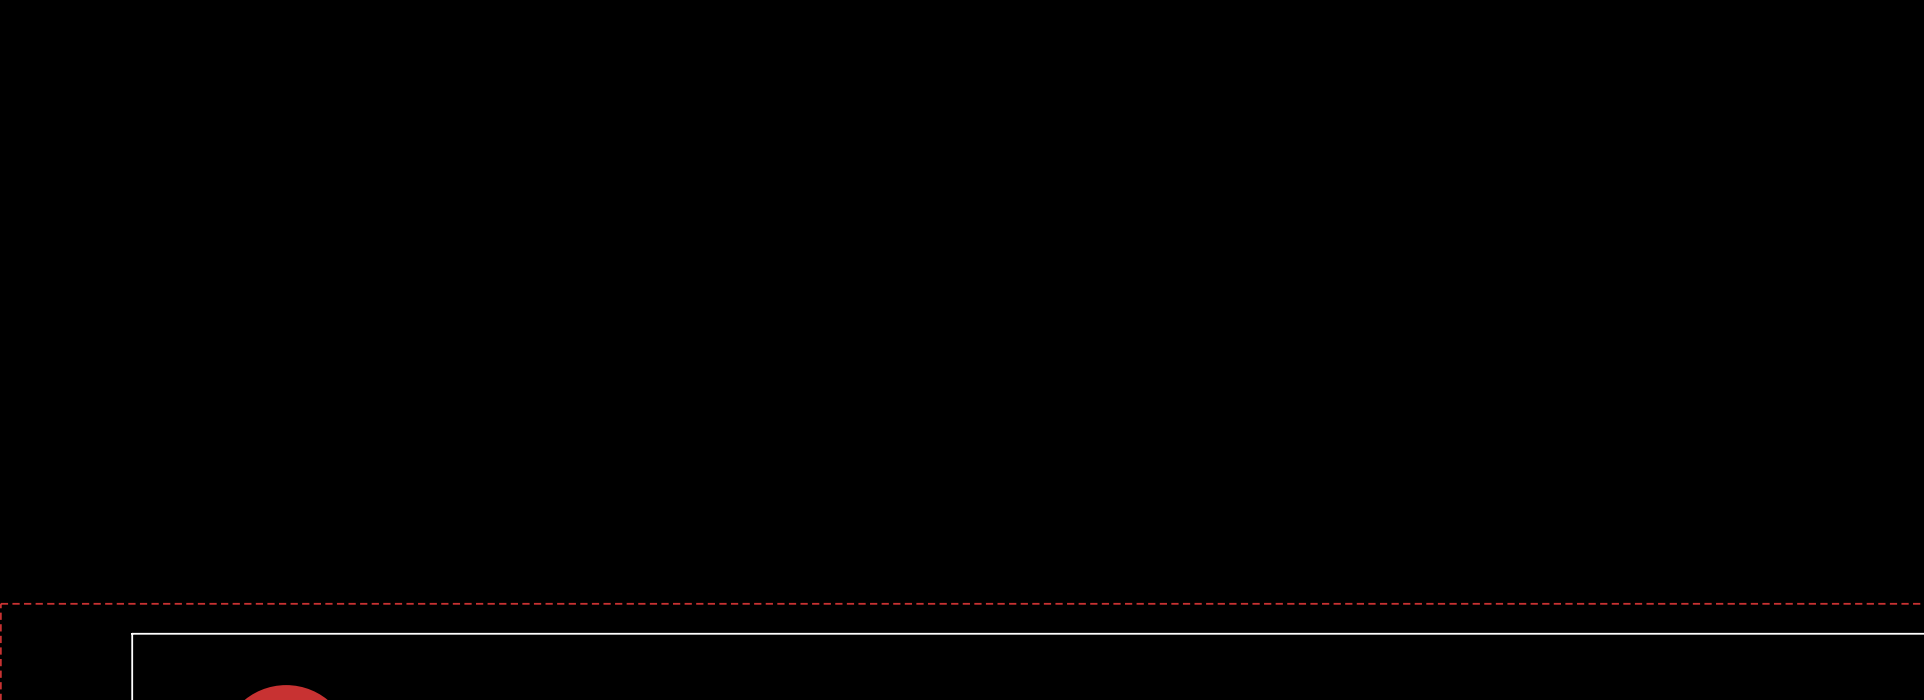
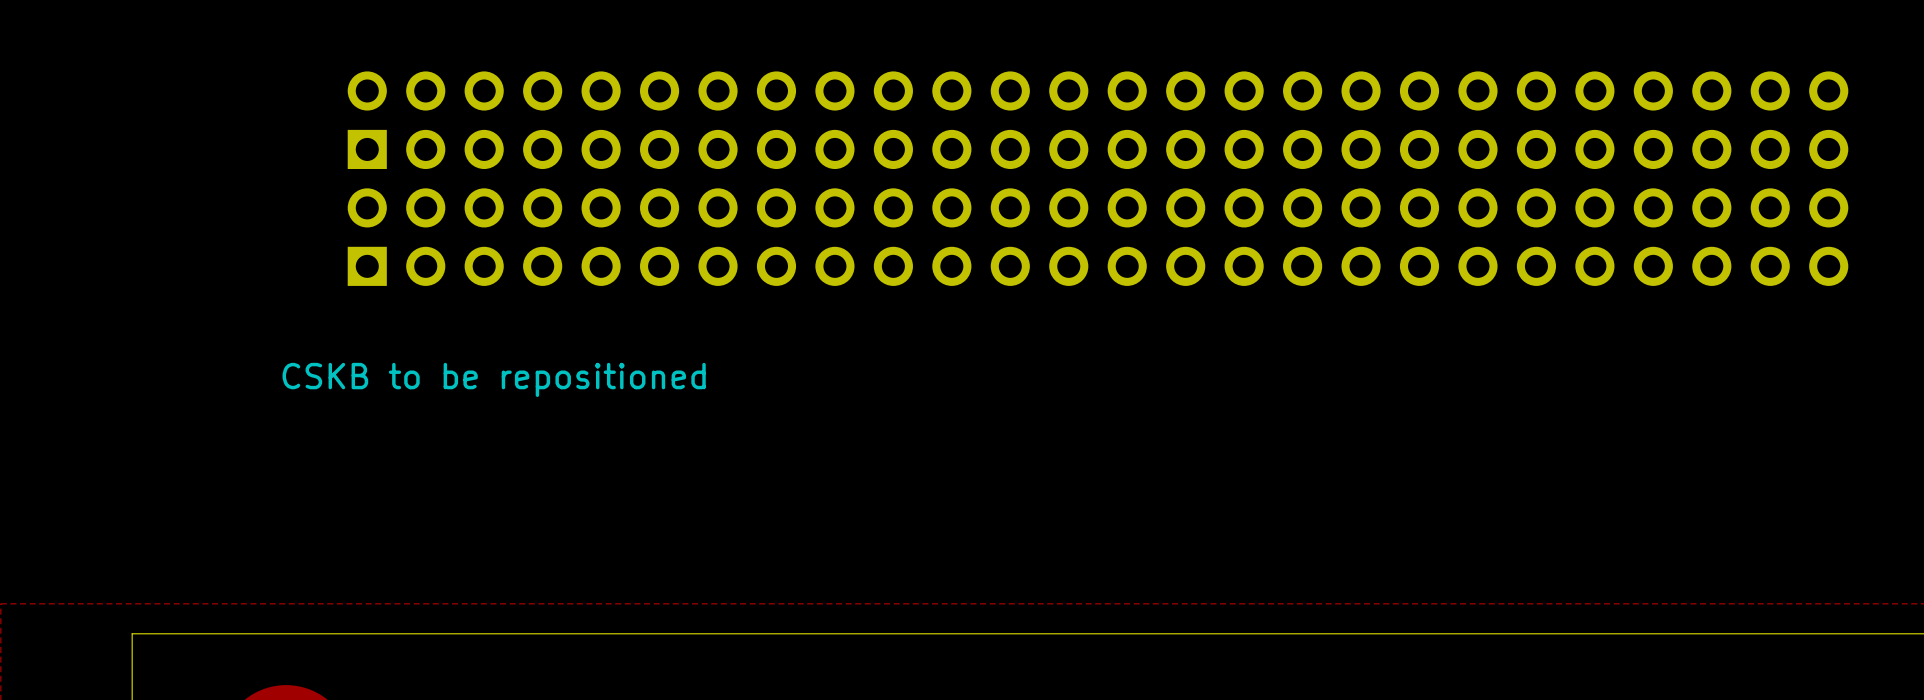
part: none -> (1098, 120)
part: none -> (1098, 237)
text: none -> CSKB to be repositioned (494, 379)

